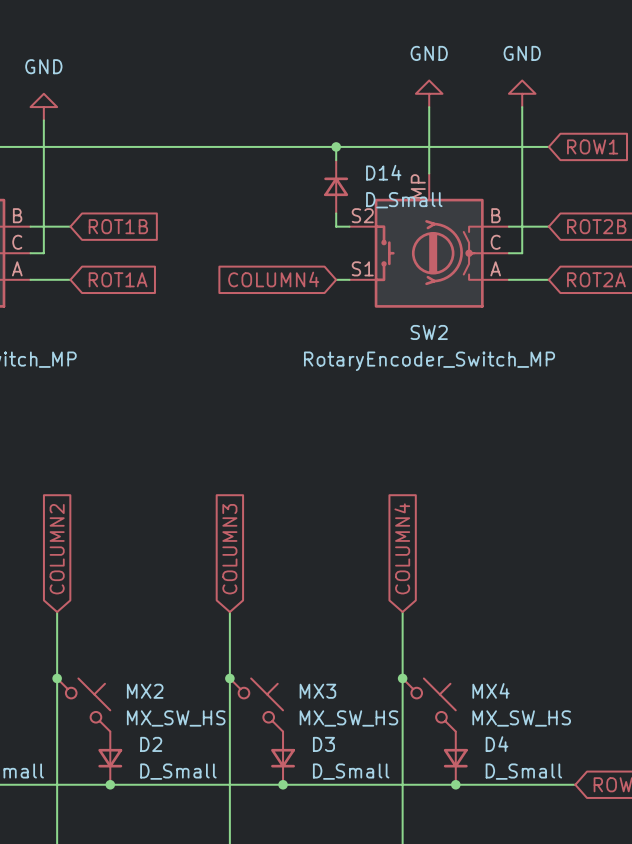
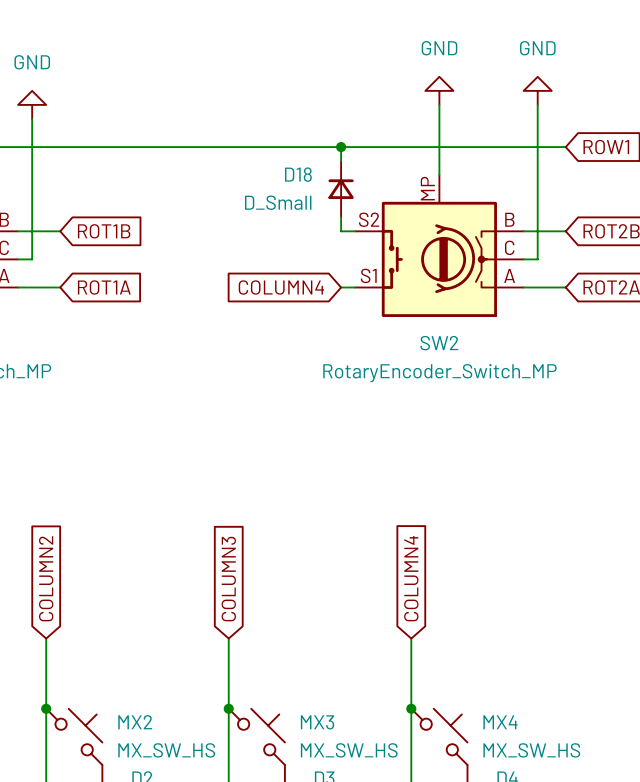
D14 name: D14 (383, 172) -> D18 (298, 174)
D14 value position: D_Small (404, 200) -> D_Small (278, 202)

